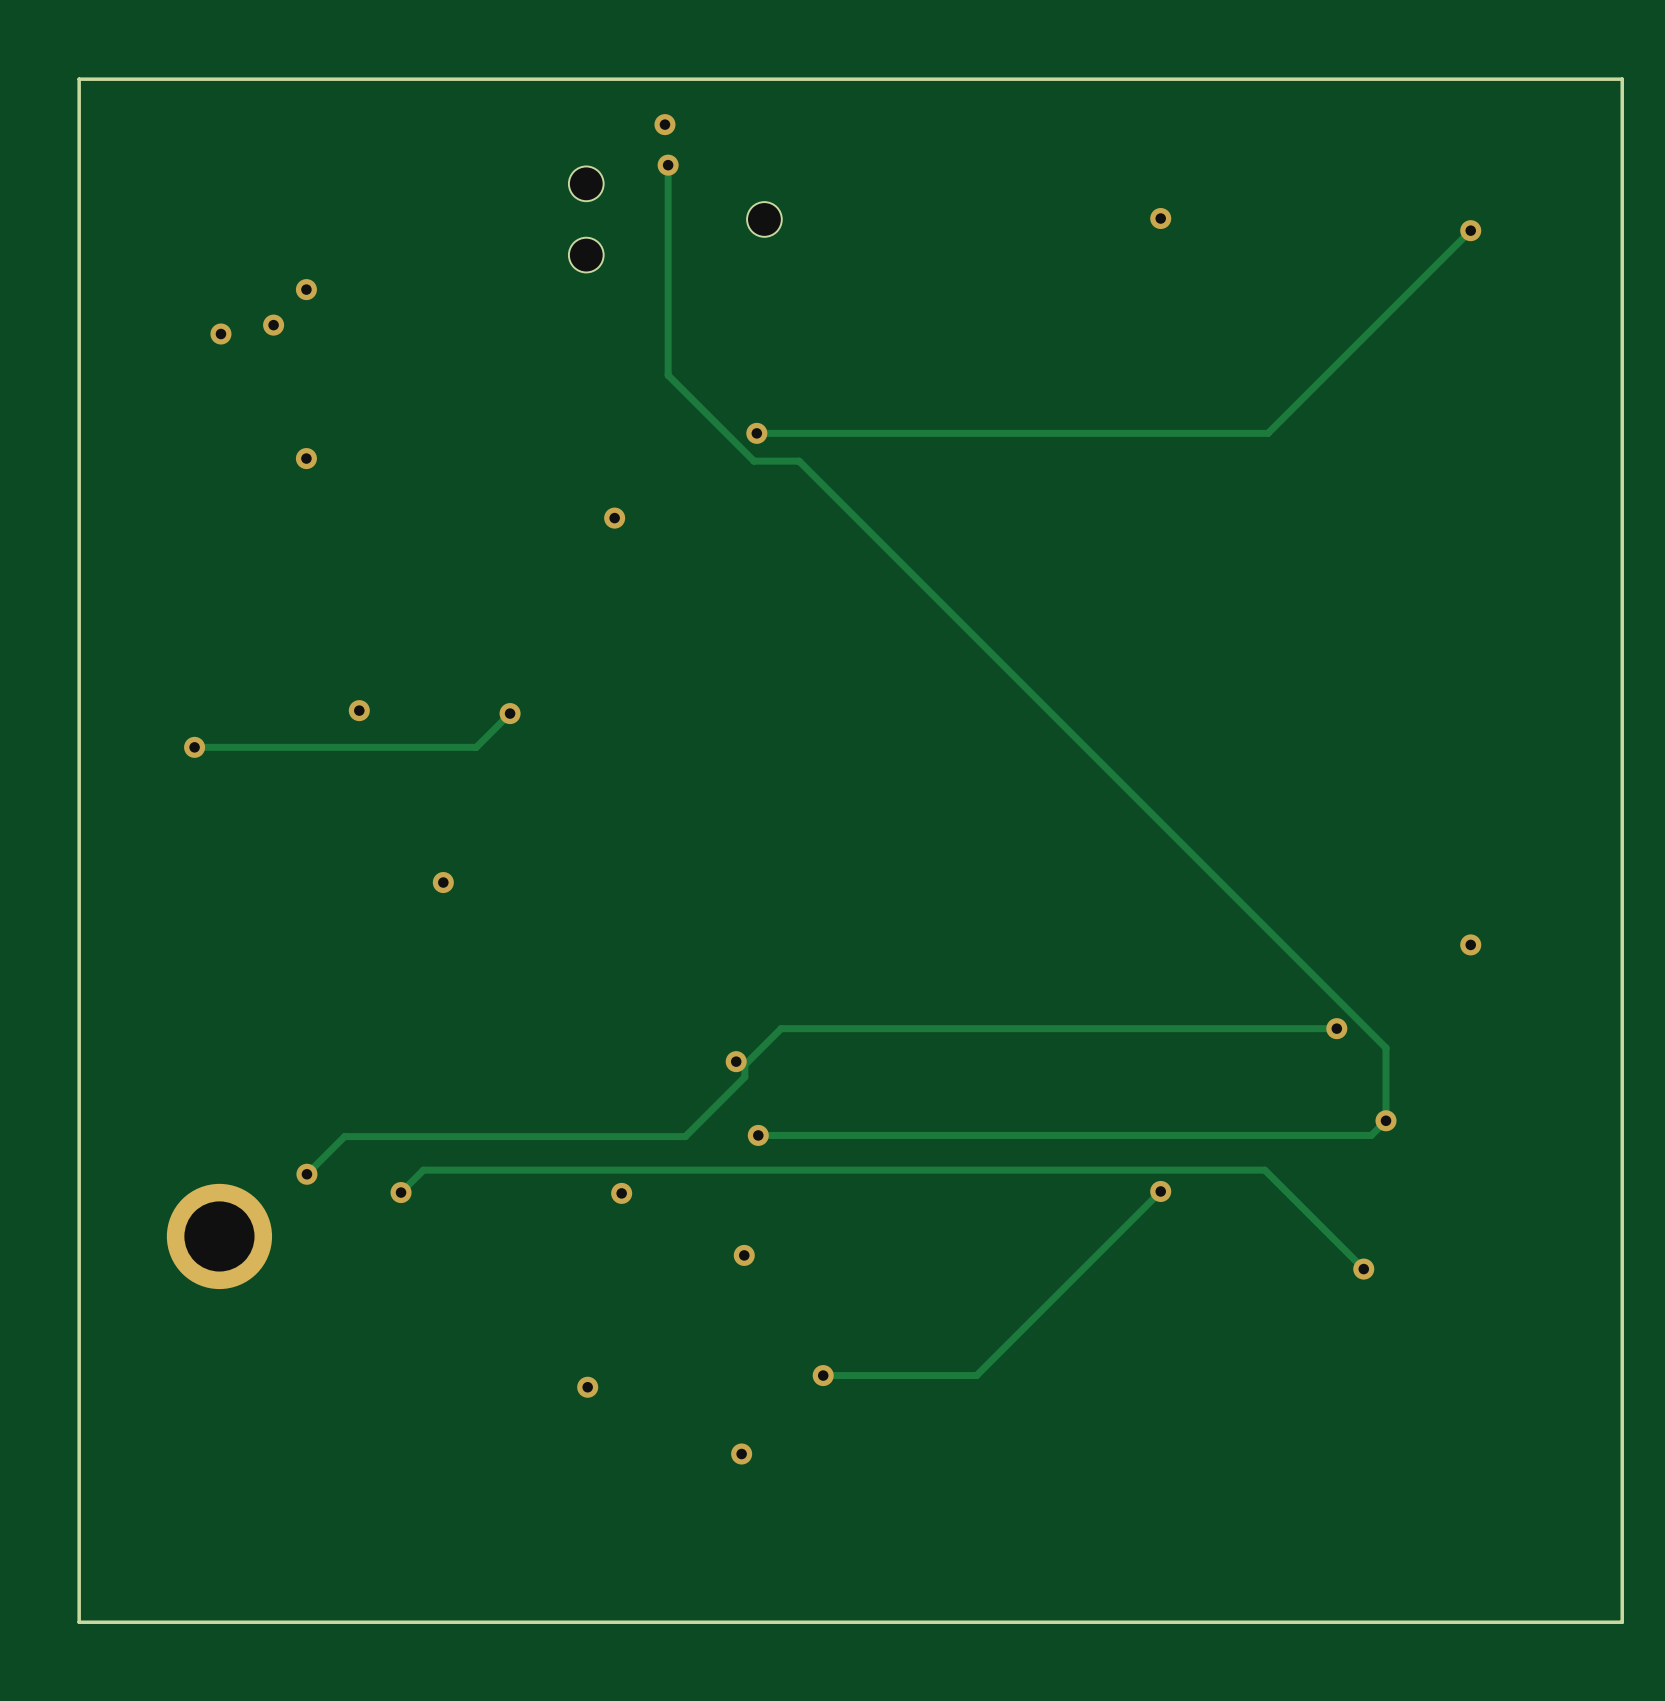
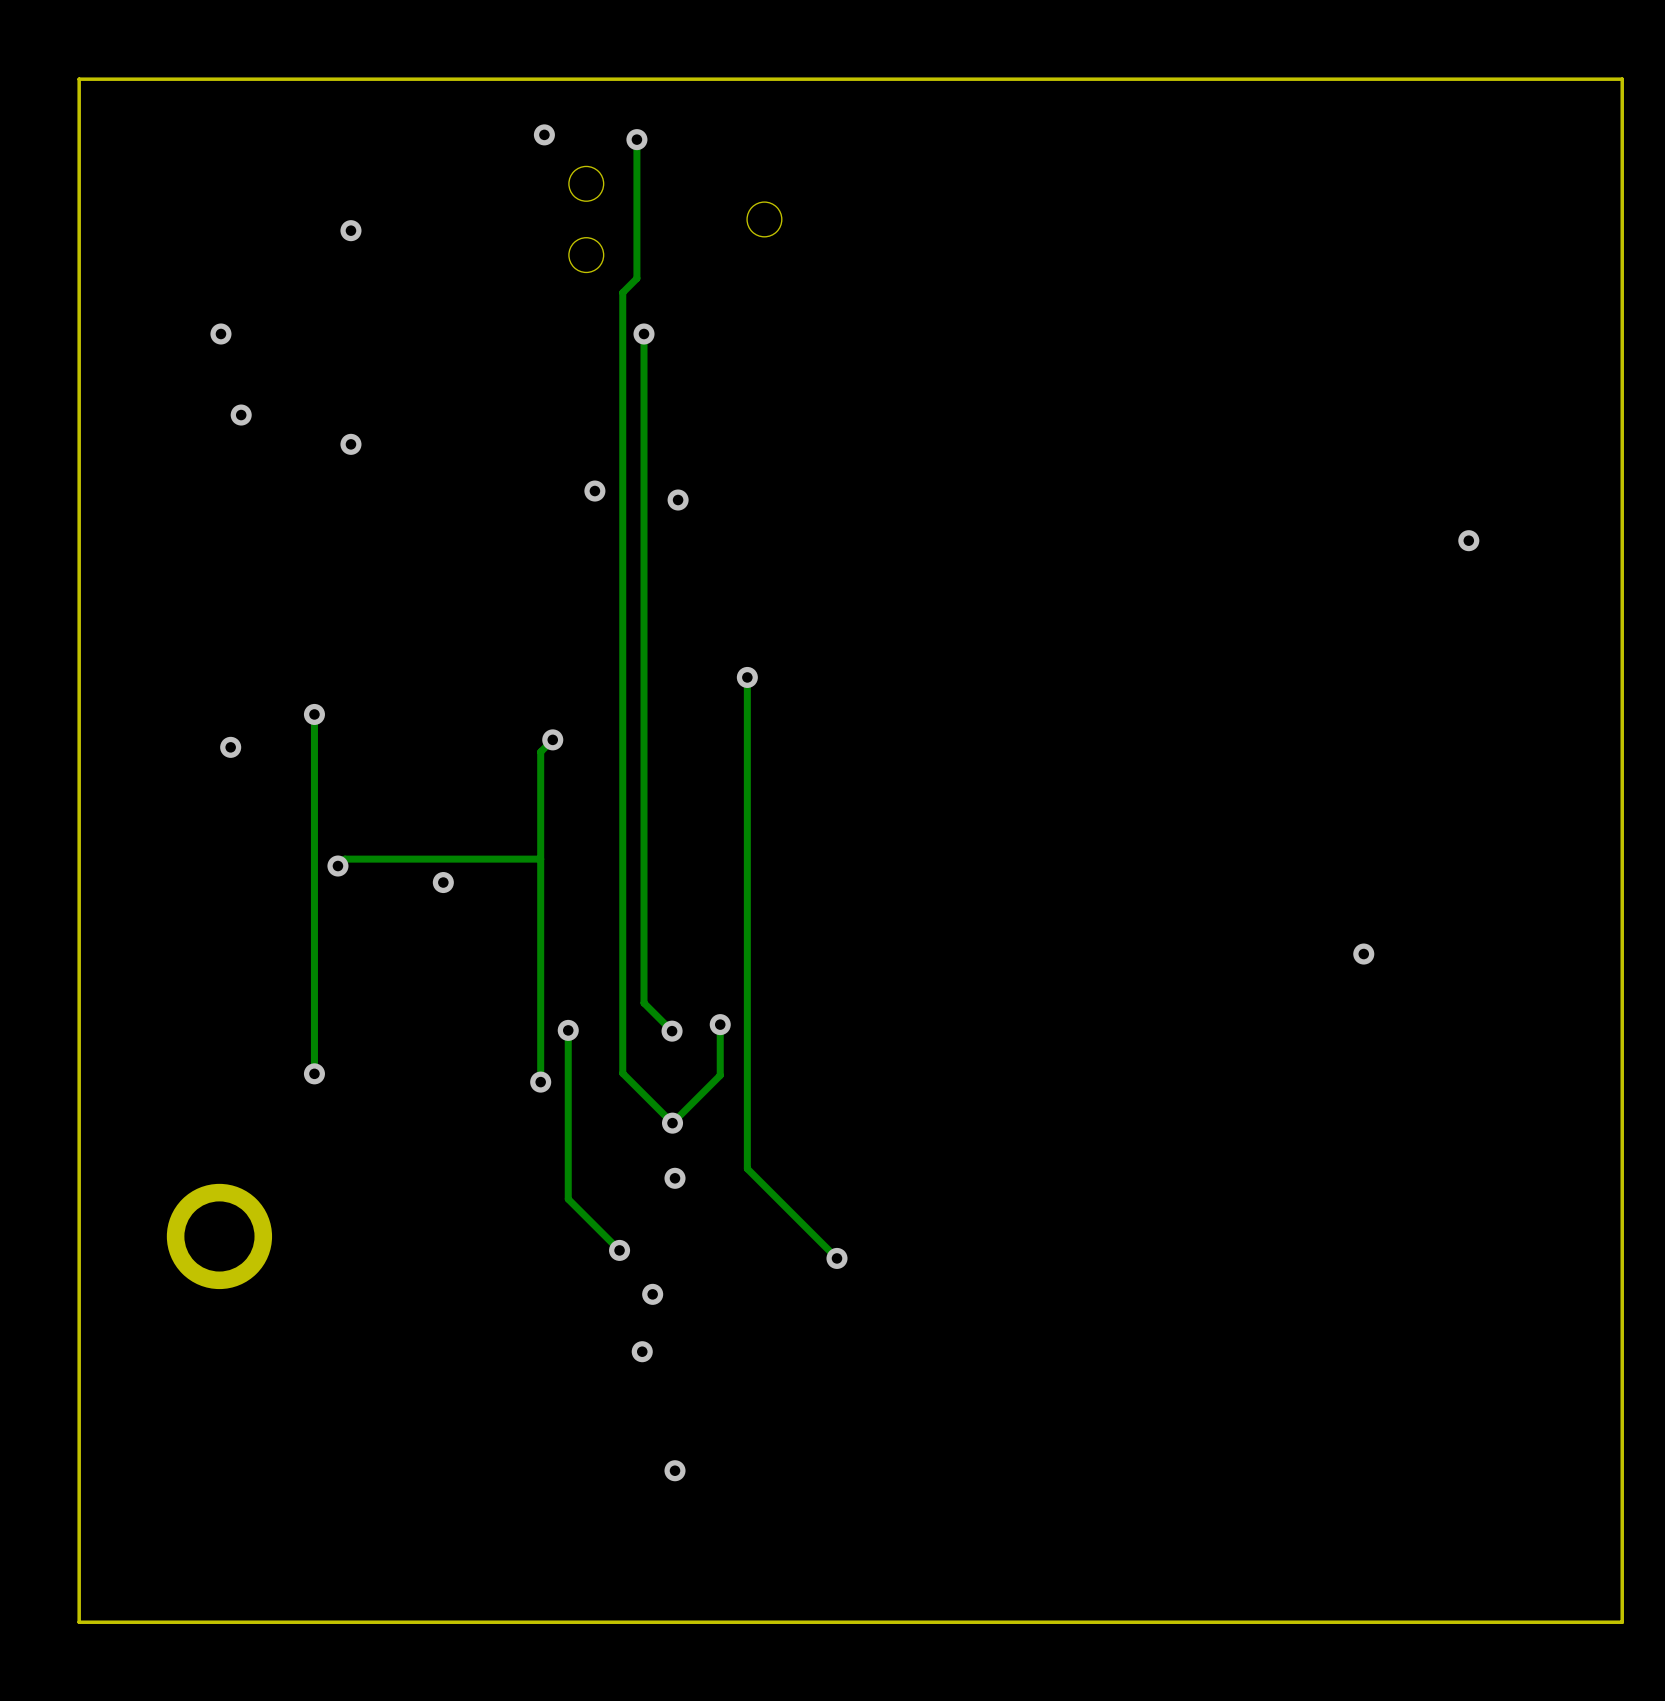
via: (664, 124) -> none
via: none -> (544, 134)
track: none -> (636, 139) (636, 278) (622, 292) (622, 1073) (672, 1123) (720, 1075) (720, 1024)
via: none -> (636, 139)
track: (668, 165) (668, 375) (753, 461) (799, 461) (1386, 1047) (1386, 1120) (1371, 1135) (758, 1135) -> none
via: (668, 165) -> none
via: (1160, 218) -> none
via: none -> (350, 230)
track: (1470, 230) (1268, 433) (756, 433) -> none
via: (1470, 230) -> none
via: (306, 289) -> none
via: (273, 325) -> none
track: none -> (644, 334) (644, 1003) (672, 1031)
via: none -> (644, 334)
via: none -> (241, 415)
via: (756, 433) -> none
via: none -> (350, 444)
via: (306, 458) -> none
via: none -> (594, 491)
via: none -> (678, 500)
via: (614, 518) -> none
via: none -> (1468, 540)
track: none -> (747, 677) (747, 1168) (836, 1258)
via: none -> (747, 677)
via position: (359, 710) -> (314, 714)
track: (510, 713) (476, 747) (194, 747) -> none
via position: (510, 713) -> (552, 739)
track: none -> (314, 714) (314, 1073)
track: none -> (552, 739) (540, 751) (540, 1082)
via position: (194, 747) -> (230, 747)
track: none -> (540, 859) (344, 859) (337, 866)
via: none -> (337, 866)
via: (1470, 944) -> none
via: none -> (1363, 954)
via: none -> (720, 1024)
track: (1336, 1028) (781, 1028) (744, 1064) -> none
via: (1336, 1028) -> none
track: none -> (568, 1030) (568, 1199) (619, 1250)
via: none -> (568, 1030)
via: none -> (672, 1031)
via: (736, 1061) -> none
track: (744, 1064) (744, 1077) (685, 1136) (344, 1136) (306, 1174) -> none
via: none -> (314, 1073)
via: none -> (540, 1082)
via: (1386, 1120) -> none
via: none -> (672, 1123)
via: (758, 1135) -> none
via: (306, 1174) -> none
via: none -> (675, 1178)
track: (1160, 1191) (976, 1375) (823, 1375) -> none
via: (1160, 1191) -> none
track: (401, 1192) (423, 1170) (1264, 1170) (1363, 1269) -> none
via: (401, 1192) -> none
via: (621, 1193) -> none
via: none -> (619, 1250)
via: (744, 1255) -> none
via: none -> (836, 1258)
via: (1363, 1269) -> none
via: none -> (652, 1294)
via: none -> (642, 1351)
via: (823, 1375) -> none
via: (587, 1387) -> none
via: (741, 1454) -> none
via: none -> (675, 1470)

